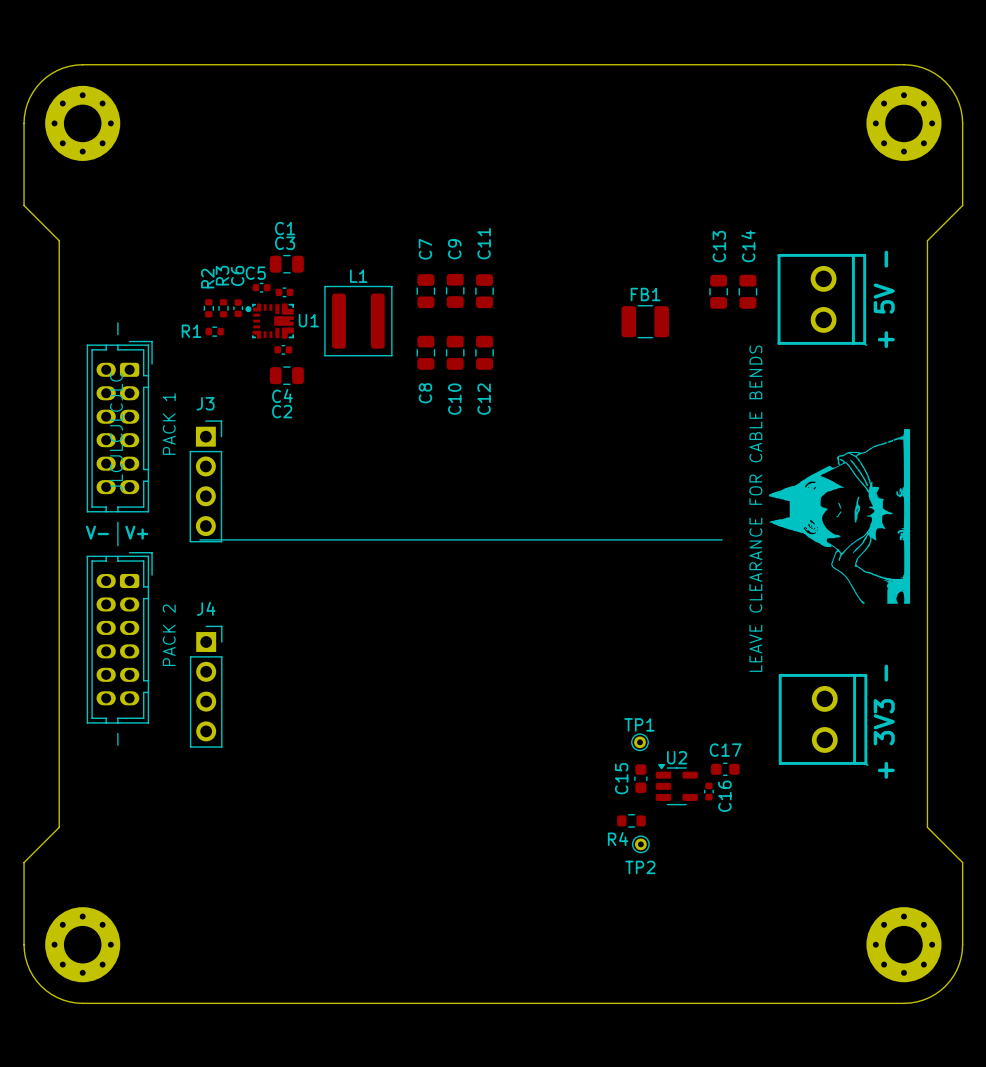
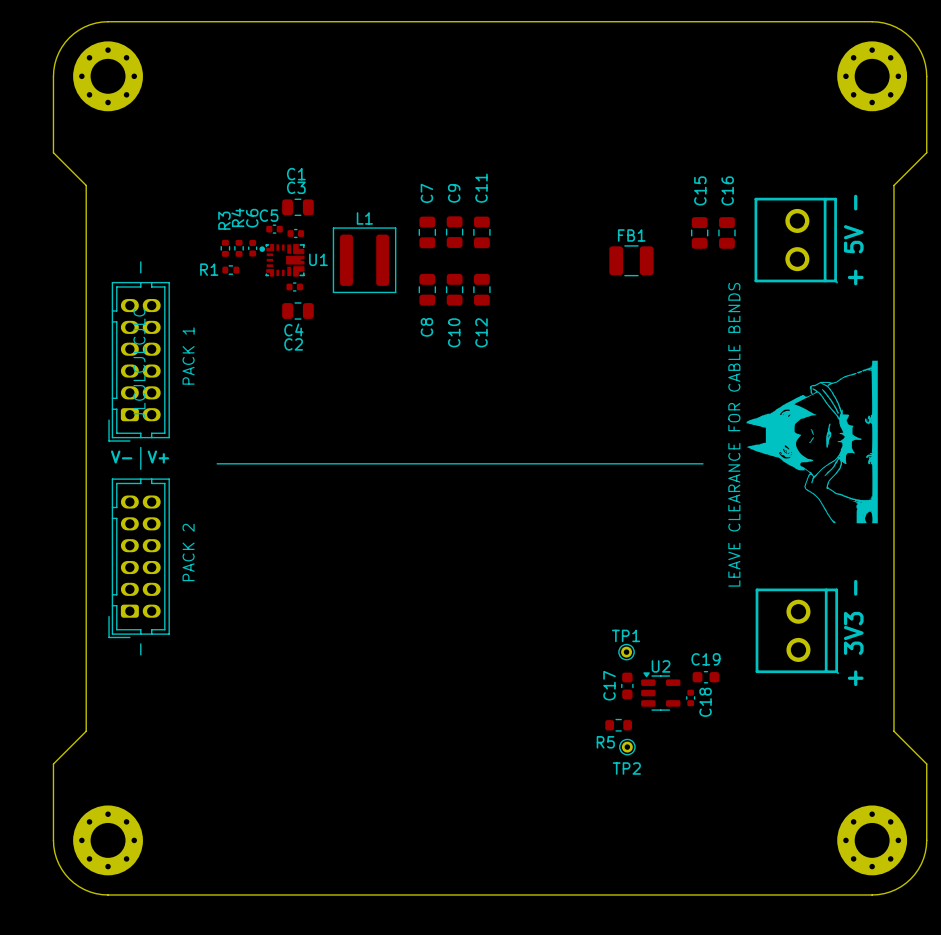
C13 name: C13 (719, 246) -> C15 (700, 190)
C14 name: C14 (748, 246) -> C16 (727, 190)
R3 name: R3 (222, 275) -> R4 (237, 217)
R2 name: R2 (207, 278) -> R3 (224, 220)
part rotation: 0° (119, 426) -> 180° (139, 361)
J3: (205, 481) -> none
part rotation: 0° (119, 637) -> 180° (139, 558)
J4: (206, 686) -> none
C17 name: C17 (725, 750) -> C19 (705, 659)
C15 name: C15 (621, 778) -> C17 (609, 685)
C16 name: C16 (724, 796) -> C18 (705, 702)
R4 name: R4 (617, 838) -> R5 (605, 742)

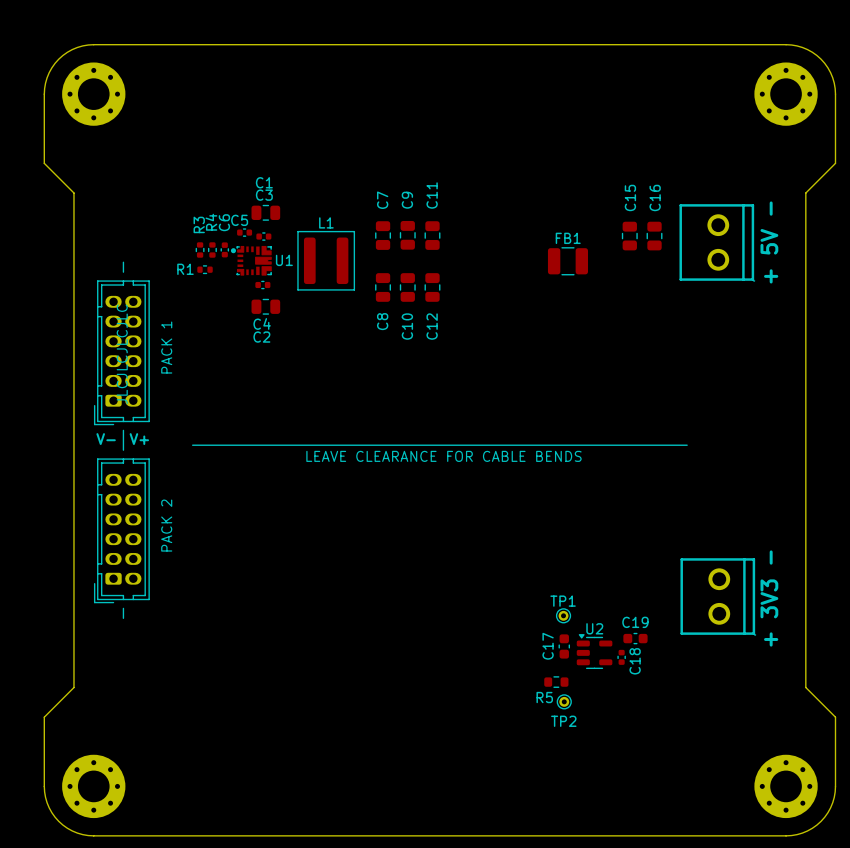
drawing: [746, 360, 878, 524] -> none
text: LEAVE CLEARANCE FOR CABLE BENDS (734, 434) -> none
line: none -> (632, 445) (687, 445)
text: none -> LEAVE CLEARANCE FOR CABLE BENDS (443, 456)

